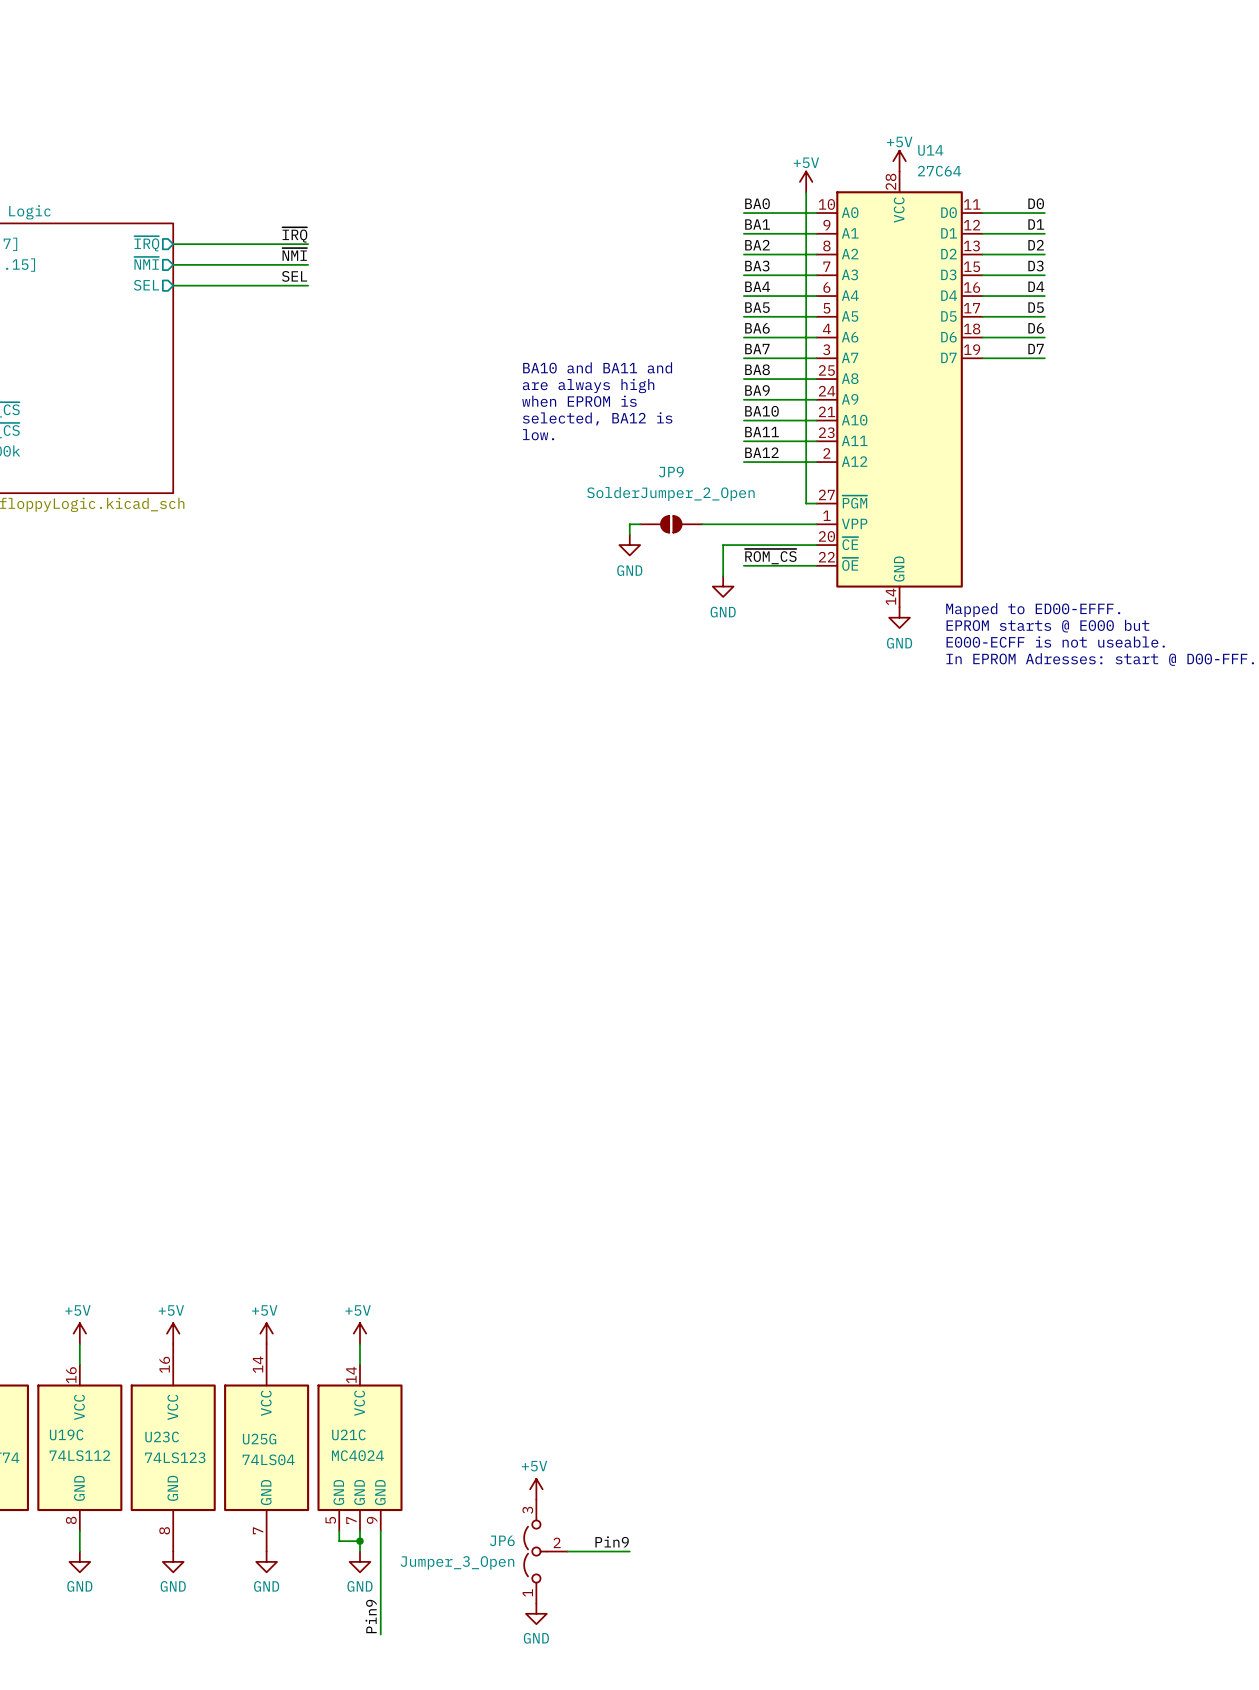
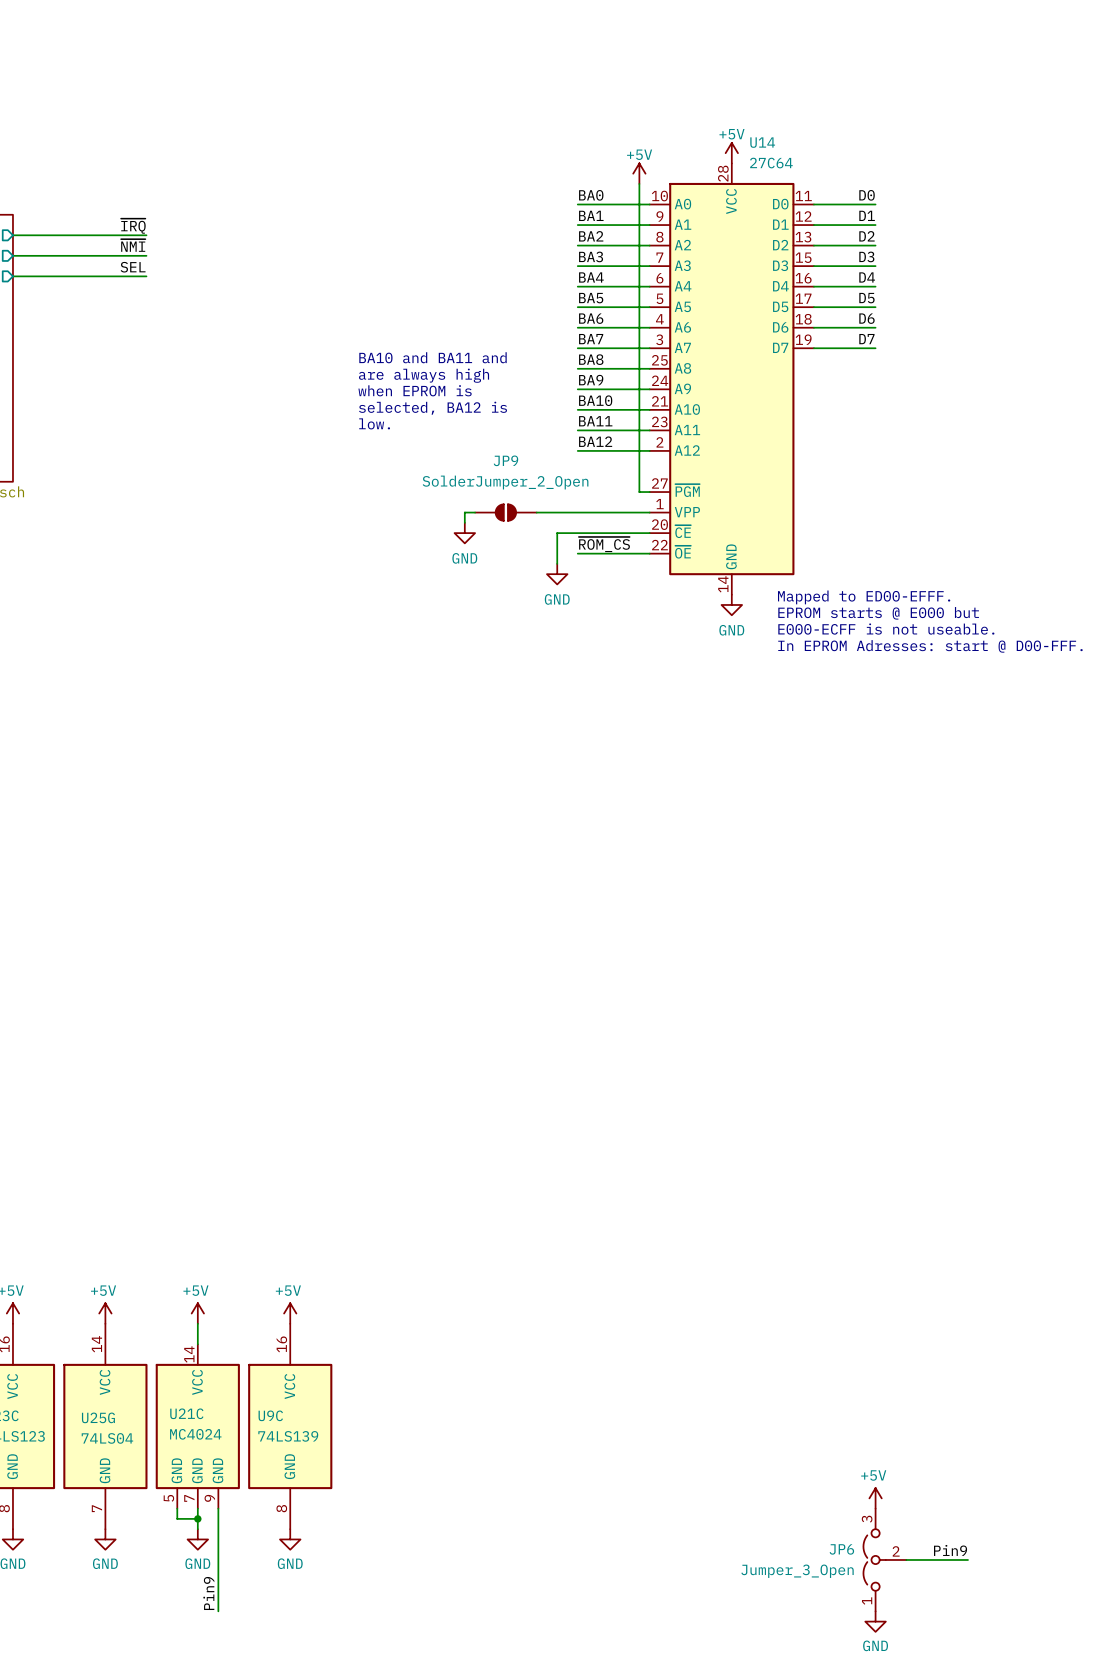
U9C: none -> 74LS139 (290, 1426)
power symbol position: +5V (536, 1489) -> +5V (290, 1313)
power symbol: none -> +5V (875, 1498)
label: Pin9 (612, 1541) -> none
JP6 position: (545, 1551) -> (884, 1559)
wire: (567, 1551) (629, 1551) -> none
label: none -> Pin9 (950, 1550)
wire: none -> (906, 1559) (967, 1559)
power symbol position: GND (536, 1613) -> GND (290, 1539)
power symbol: none -> GND (875, 1621)

